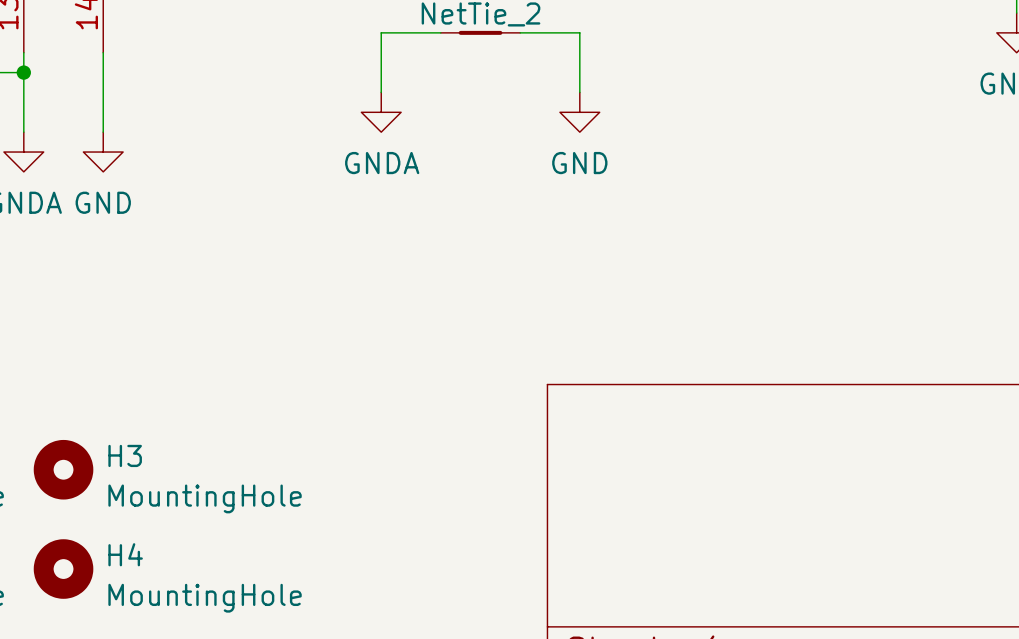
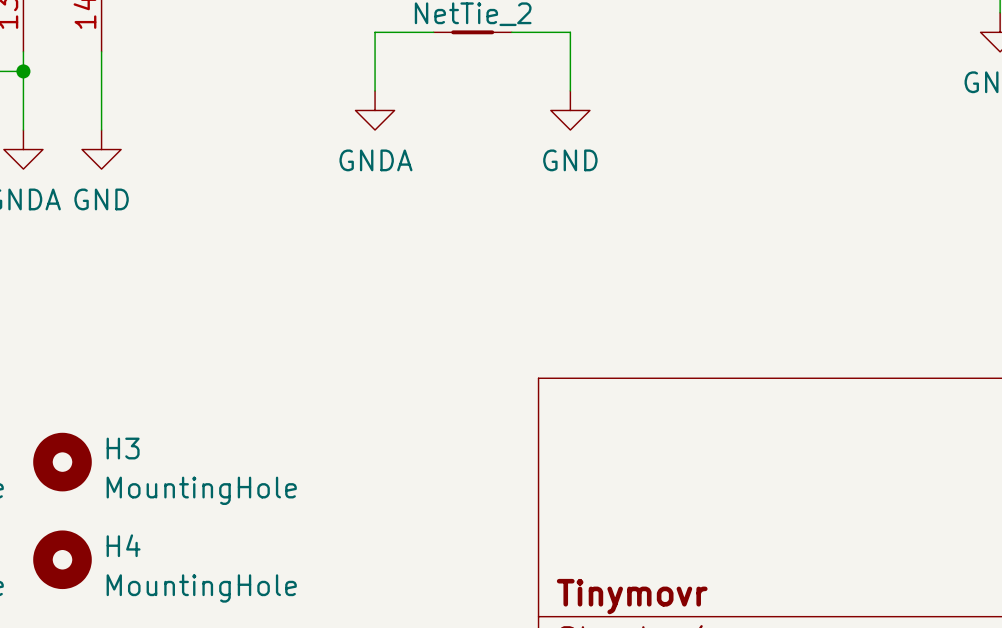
title block: none -> Tinymovr (632, 596)

